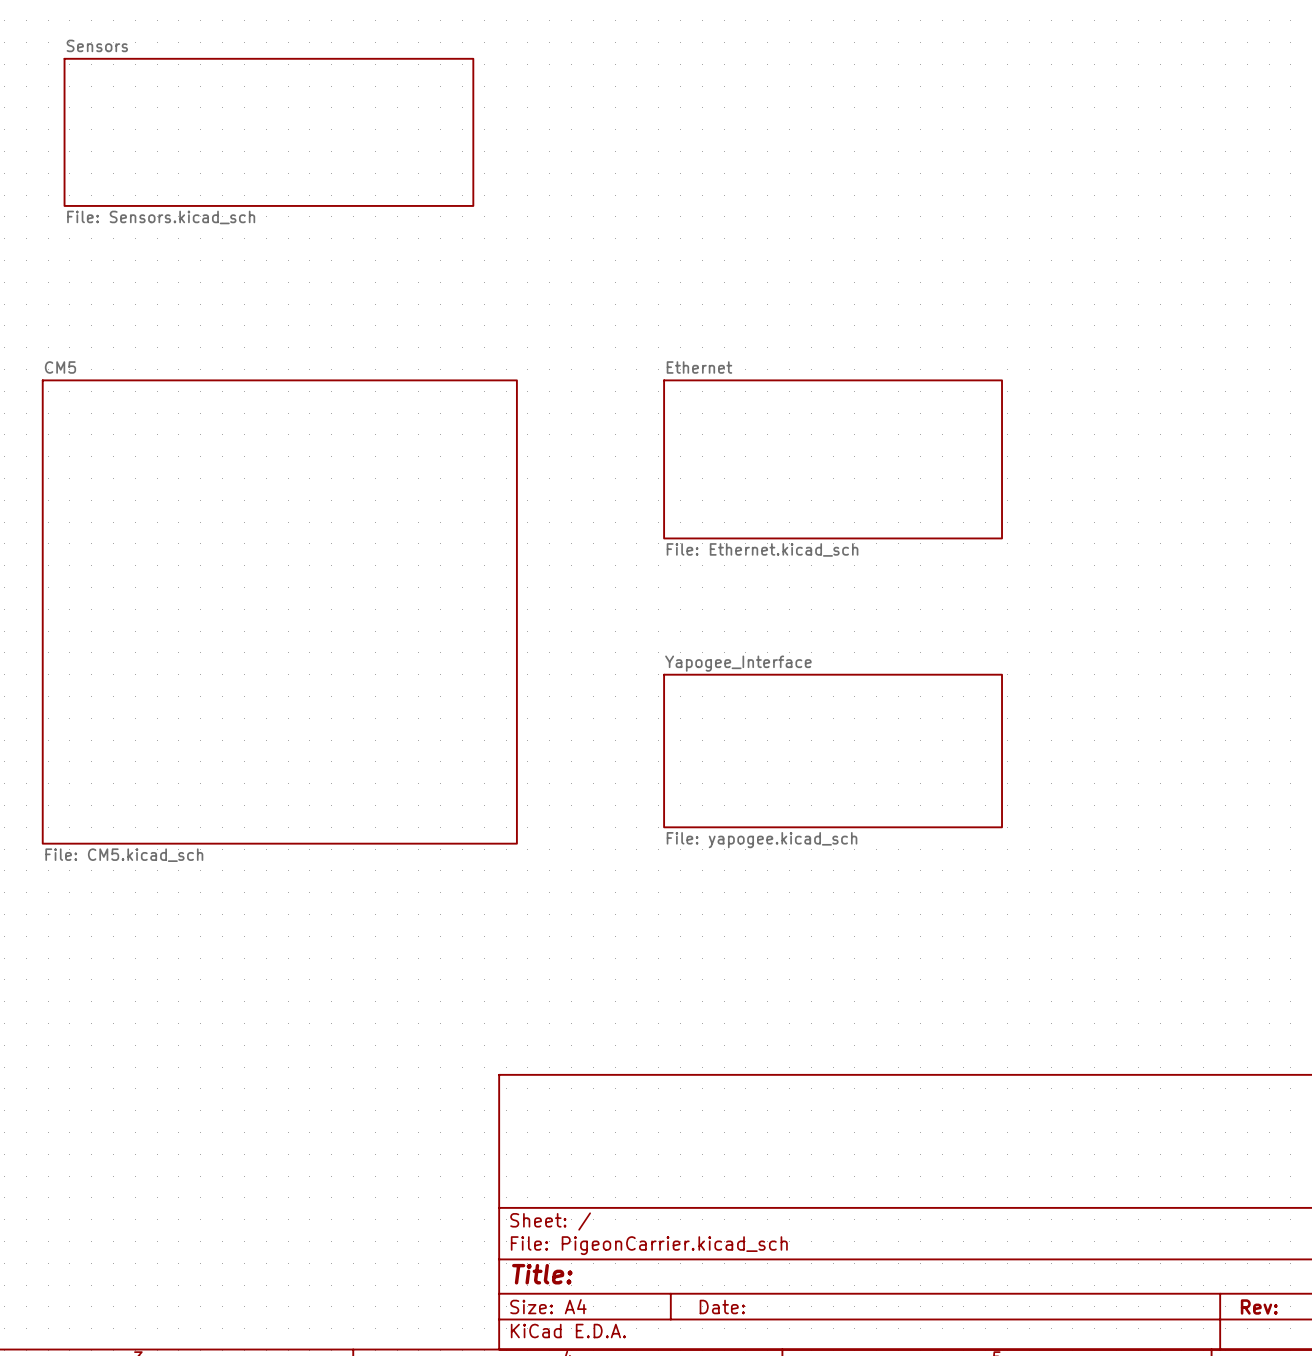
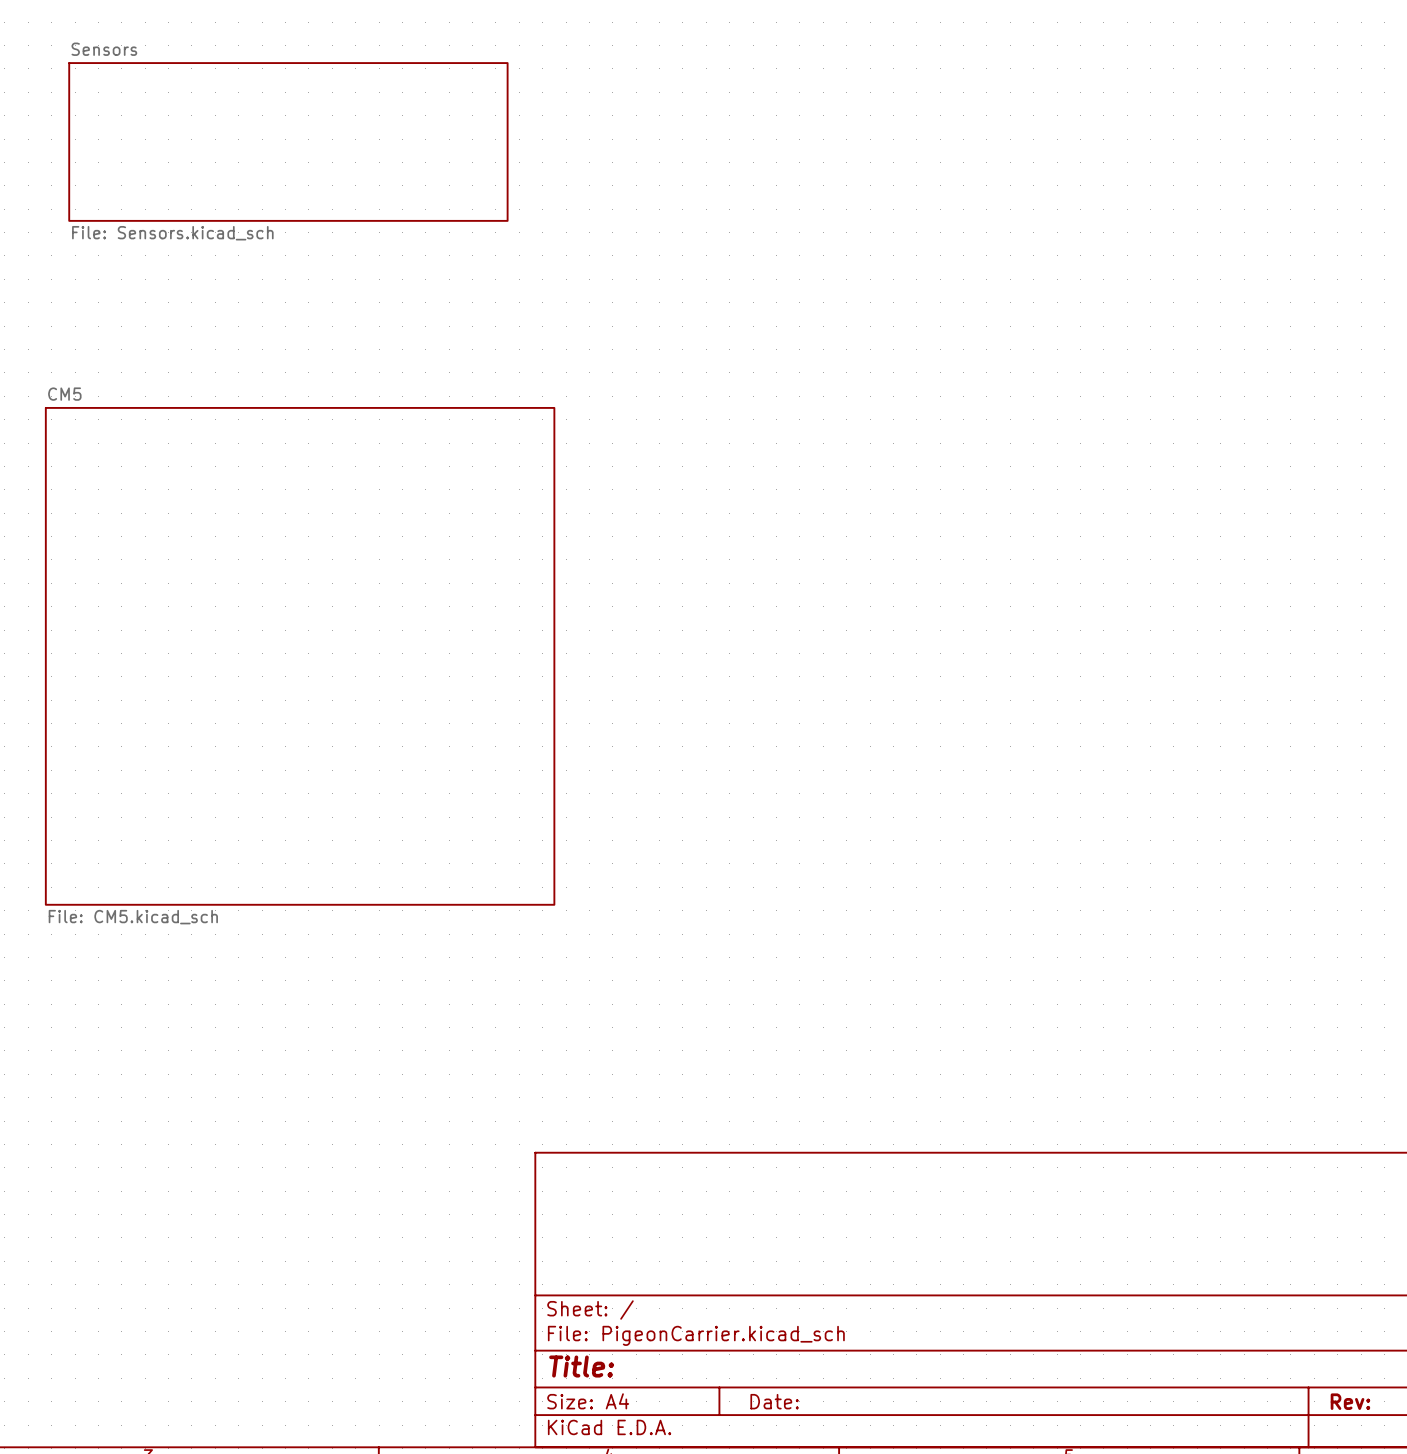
sheet Ethernet: File: Ethernet.kicad_sch (833, 459) -> none
sheet Yapogee_Interface: File: yapogee.kicad_sch (833, 751) -> none

